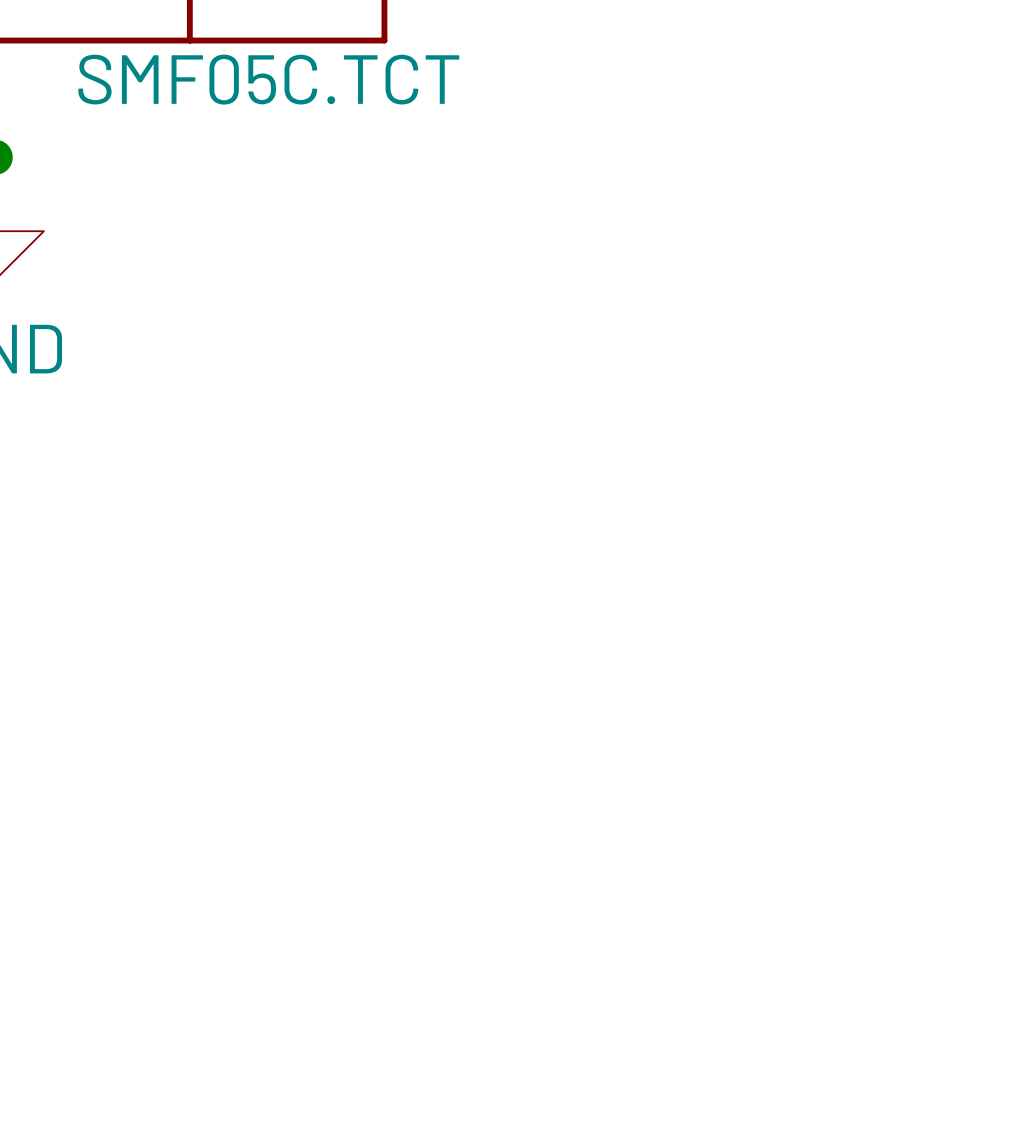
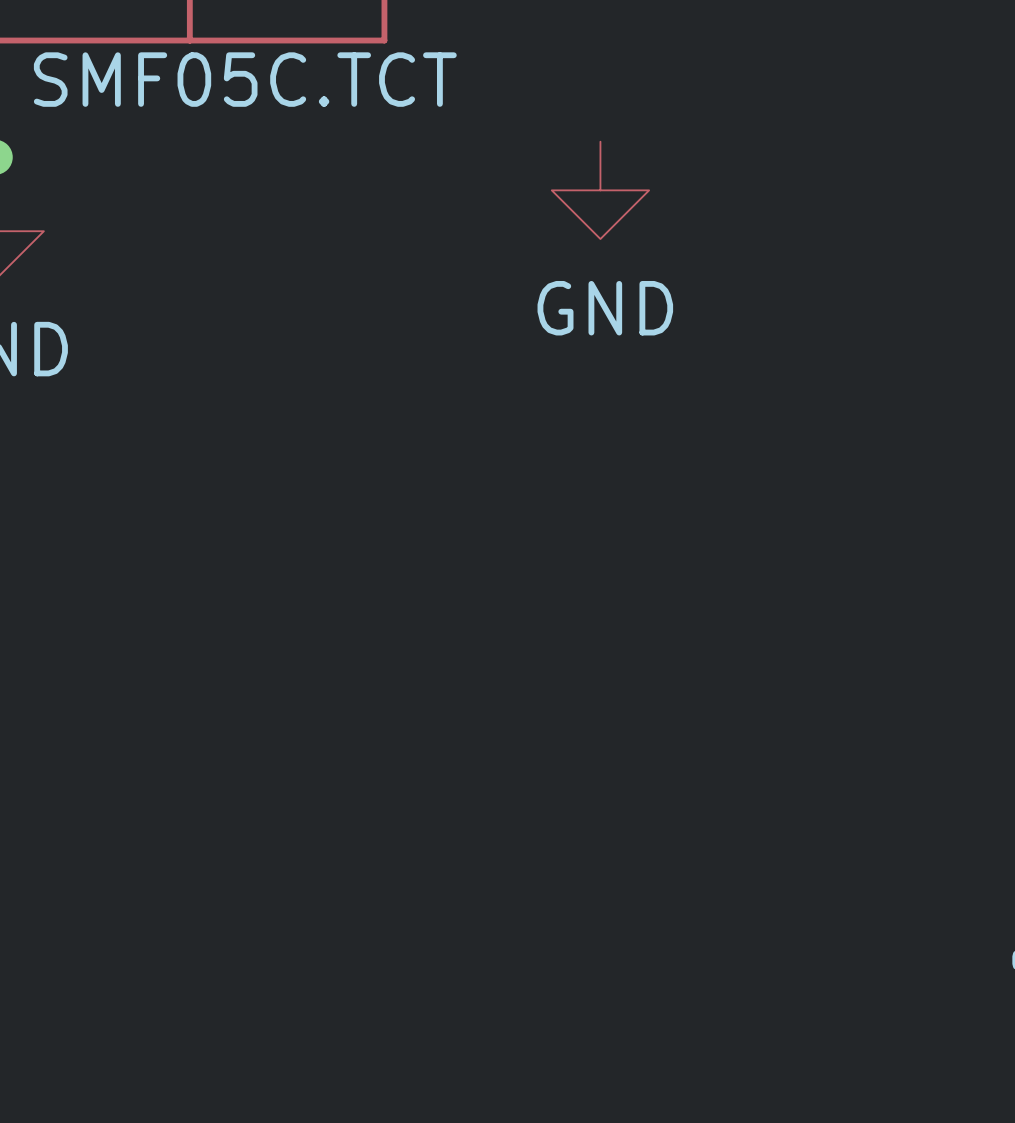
power symbol: none -> GND (600, 190)

